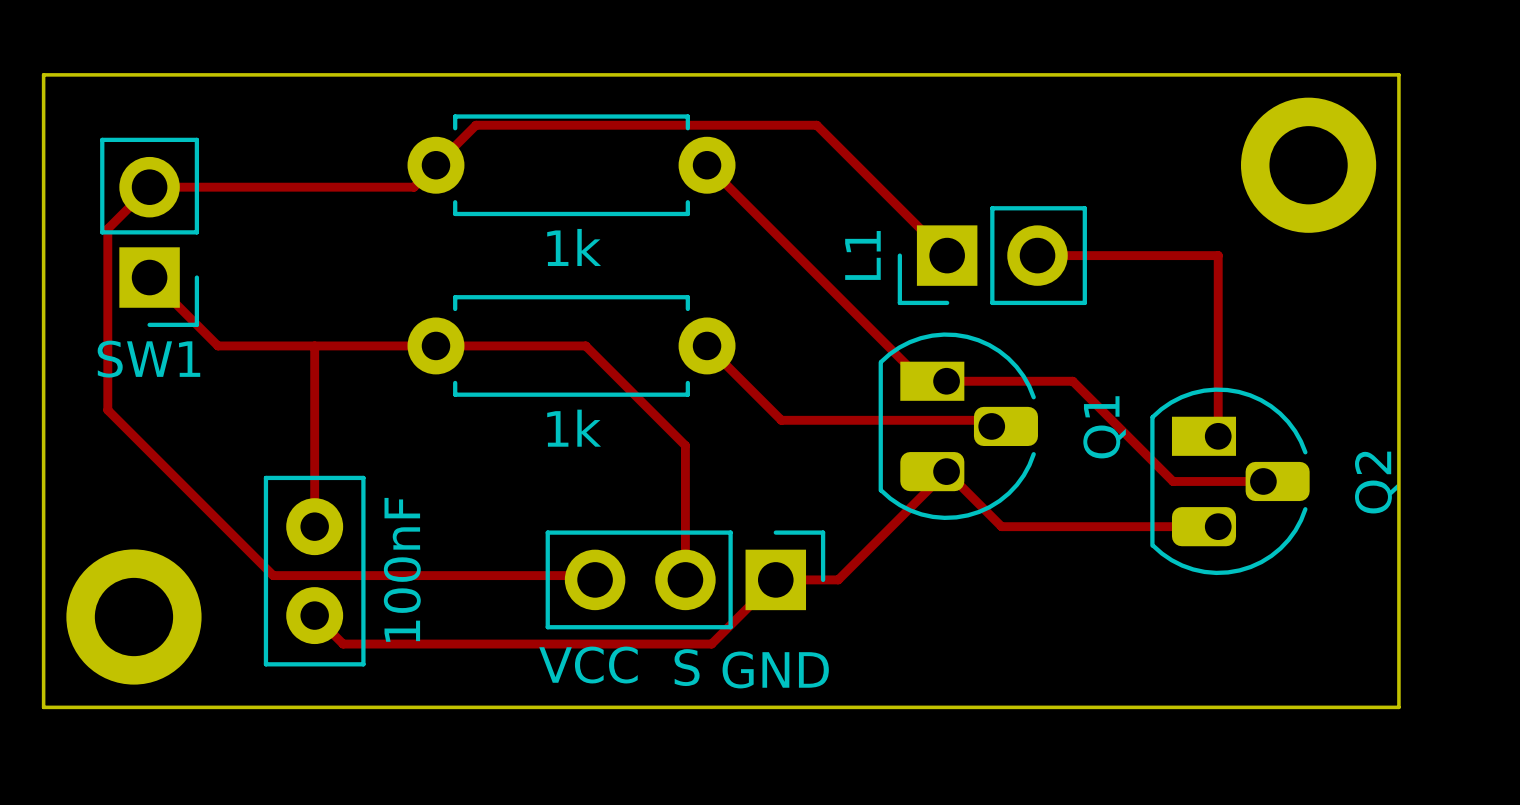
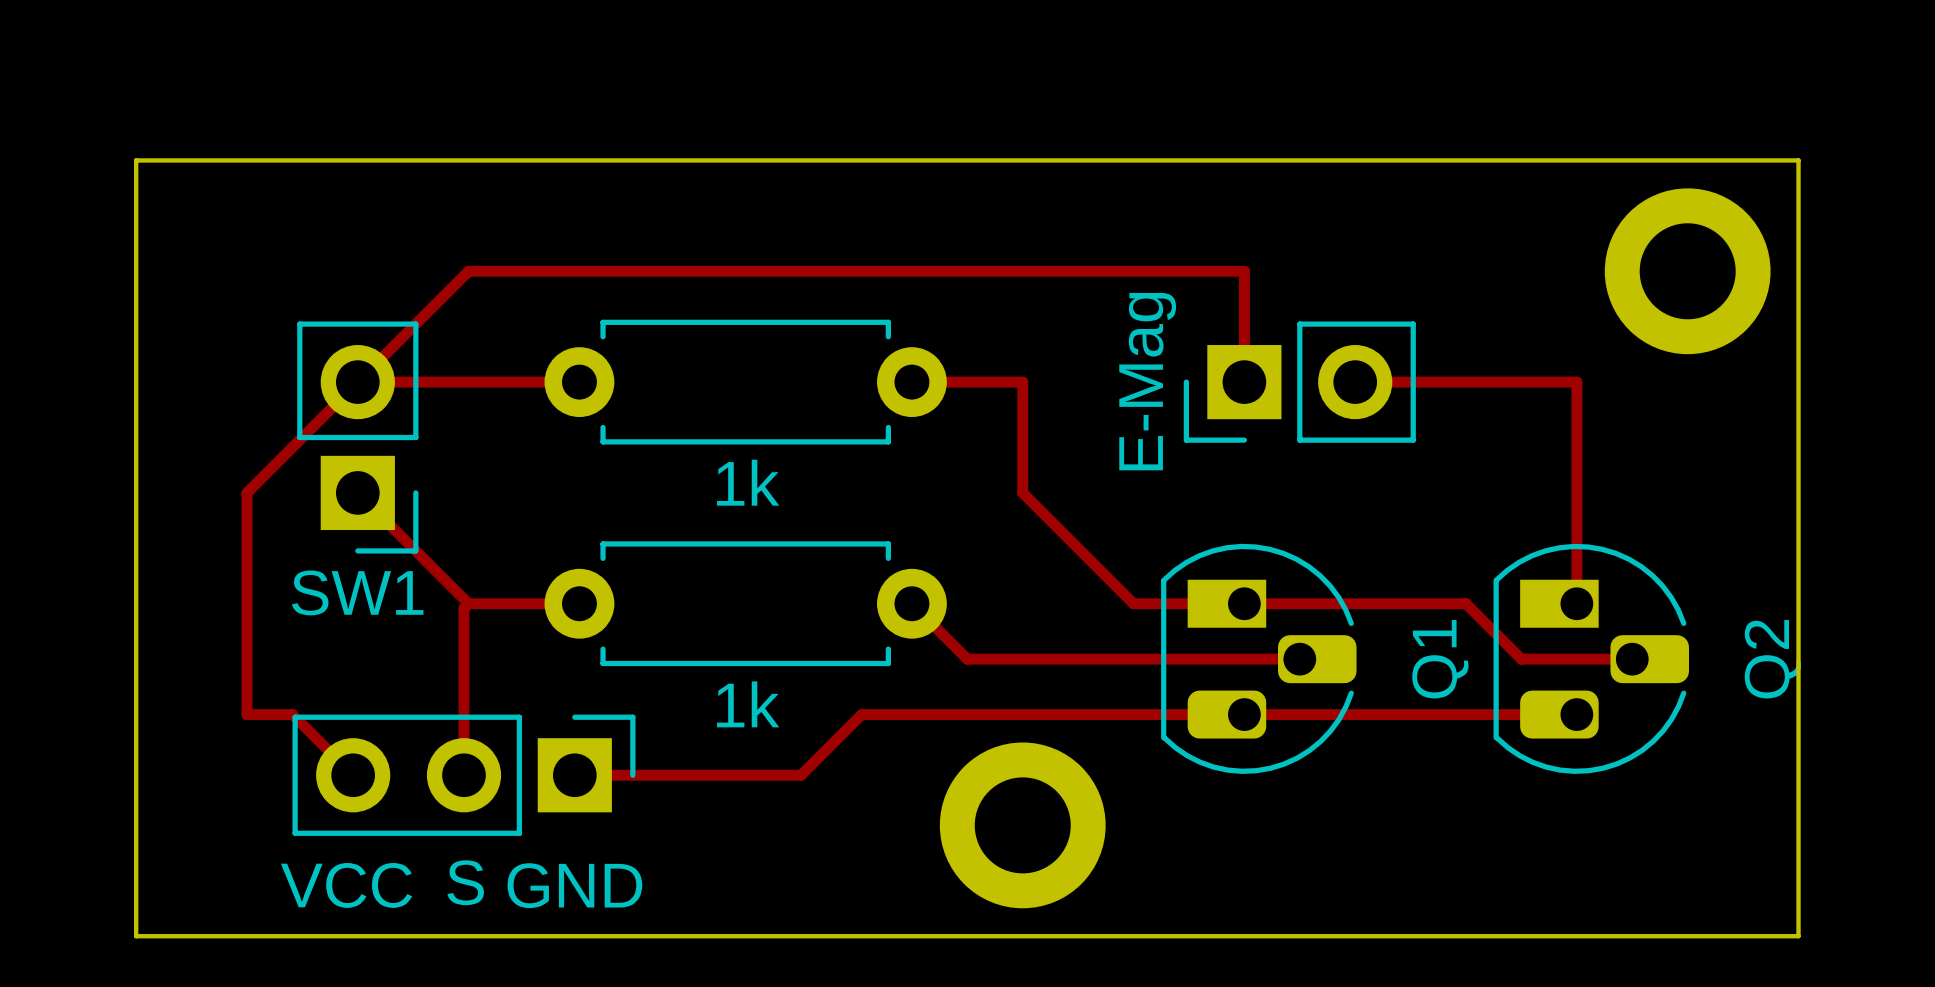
part: 1k (571, 165) -> none
track: (707, 165) (923, 381) (1072, 381) (1127, 436) -> (911, 382) (1022, 382) (1022, 492) (1133, 603) (1466, 603)
SW1 position: (149, 232) -> (357, 437)
track: none -> (357, 382) (579, 382)
part: none -> 1k (745, 382)
L1 name: L1 (862, 255) -> E-Mag (1147, 381)
track: (947, 255) (816, 125) (475, 125) (414, 187) (149, 187) (107, 228) (107, 410) (273, 575) (590, 575) (595, 579) -> (1244, 382) (1244, 271) (468, 271) (246, 492) (246, 714) (292, 714) (353, 775)
track: (149, 277) (217, 345) (585, 345) (676, 436) -> none
track: none -> (357, 492) (468, 603)
track: (314, 345) (314, 526) -> none
part: 1k (571, 345) -> none
track: (707, 345) (781, 420) (985, 420) -> none
Q1 position: (958, 426) -> (1258, 658)
track: none -> (468, 603) (579, 603)
track: none -> (468, 603) (463, 608) (463, 775)
part: none -> 1k (745, 603)
track: (685, 445) (685, 579) -> (923, 615) (967, 659) (1299, 659)
track: (1001, 526) (946, 471) (838, 579) (775, 579) (711, 644) (343, 644) (314, 615) -> (1311, 714) (861, 714) (801, 775) (574, 775)
100nF: (314, 571) -> none
part position: (685, 579) -> (463, 775)
part position: (133, 617) -> (1022, 825)
text position: VCC (588, 665) -> VCC (346, 885)
text position: S (687, 667) -> S (465, 882)
text position: GND (775, 669) -> GND (574, 885)

